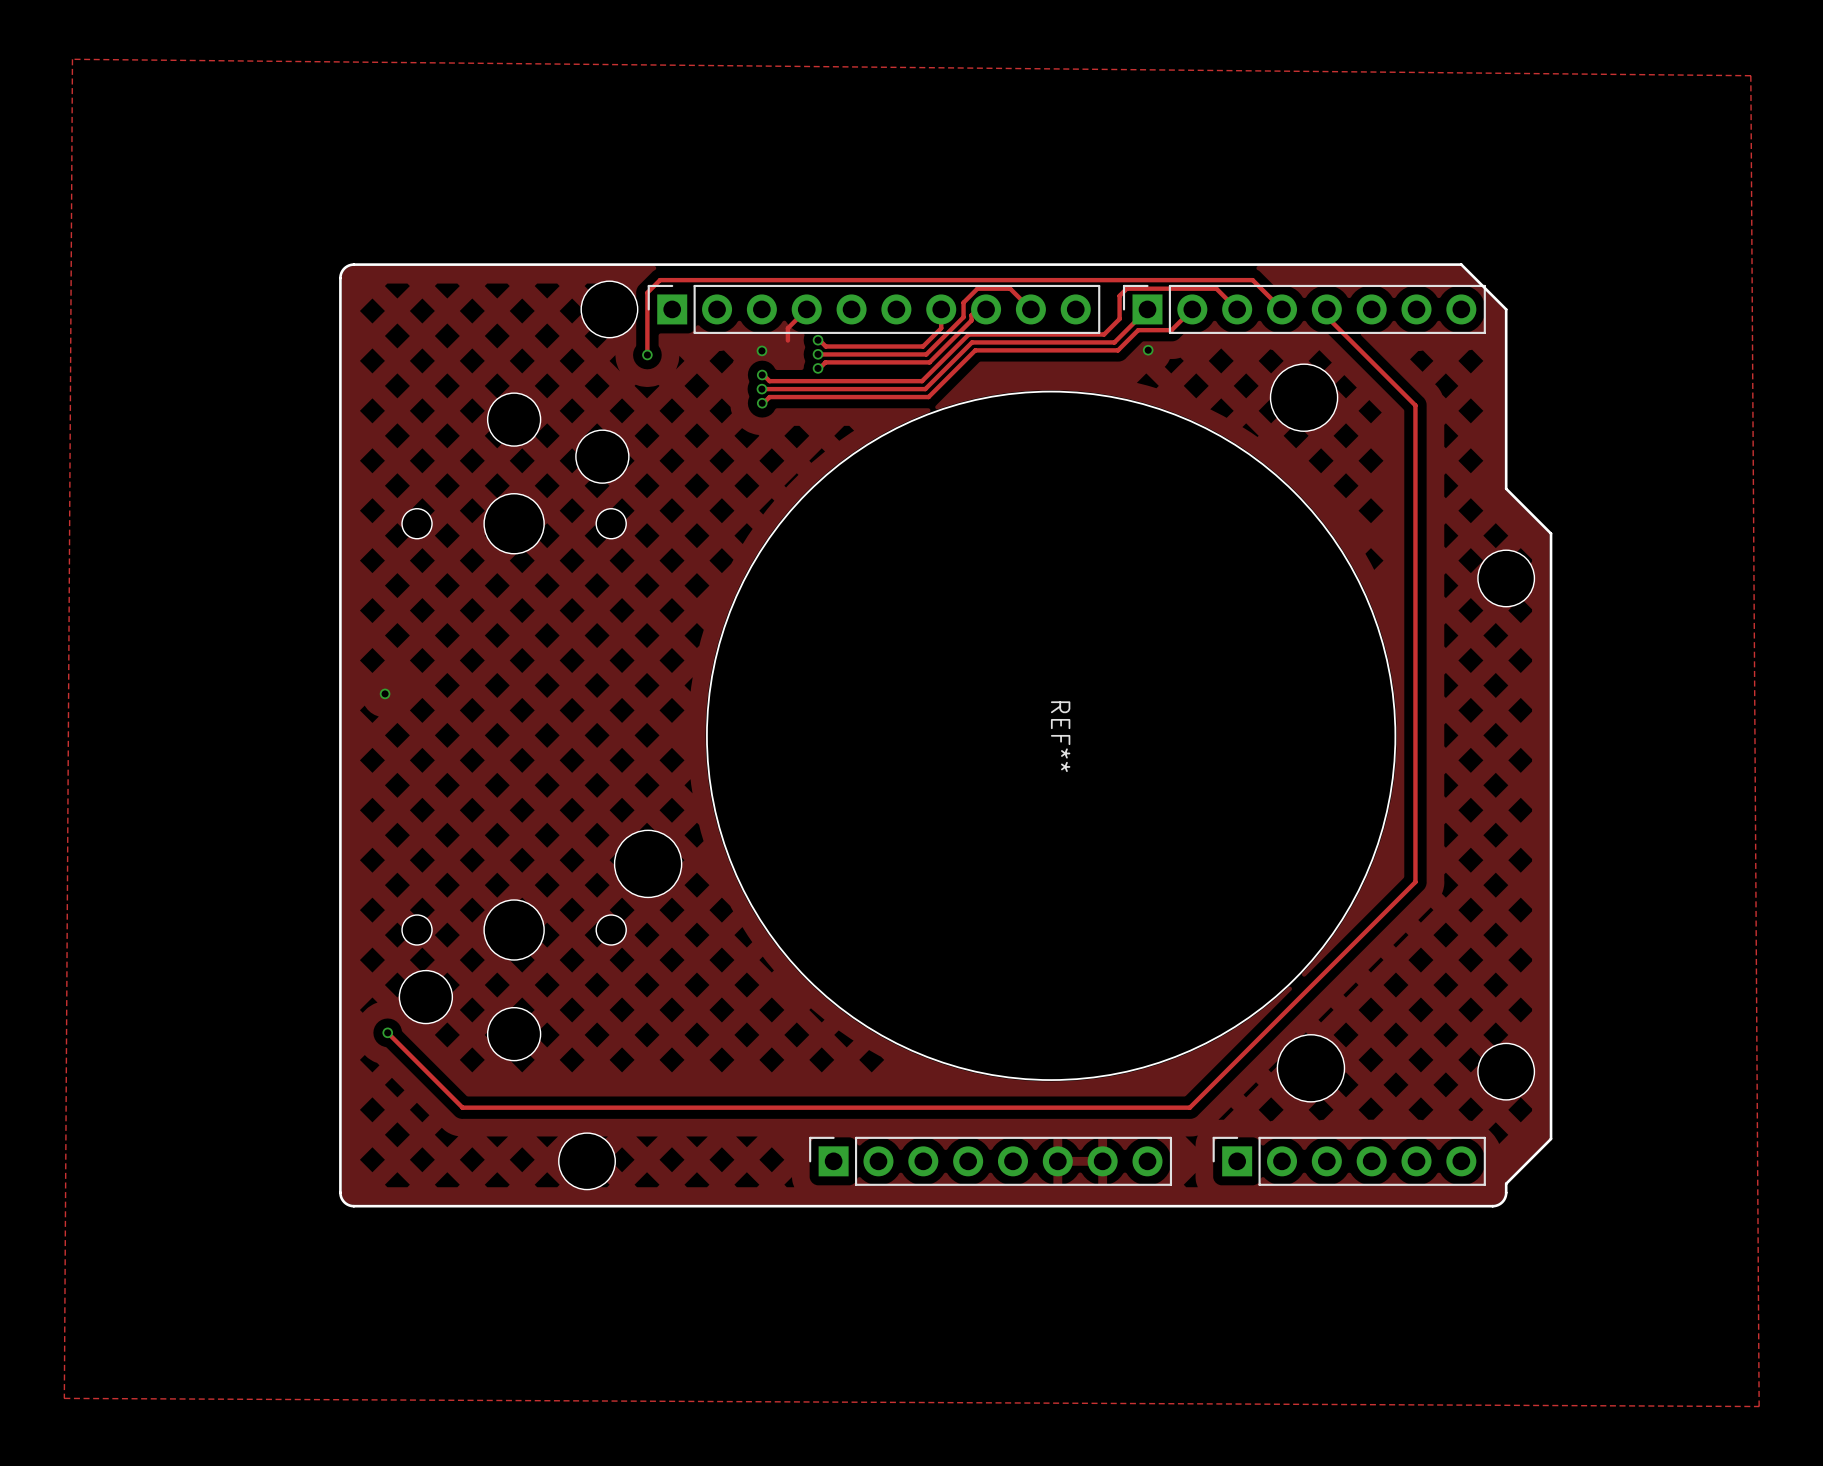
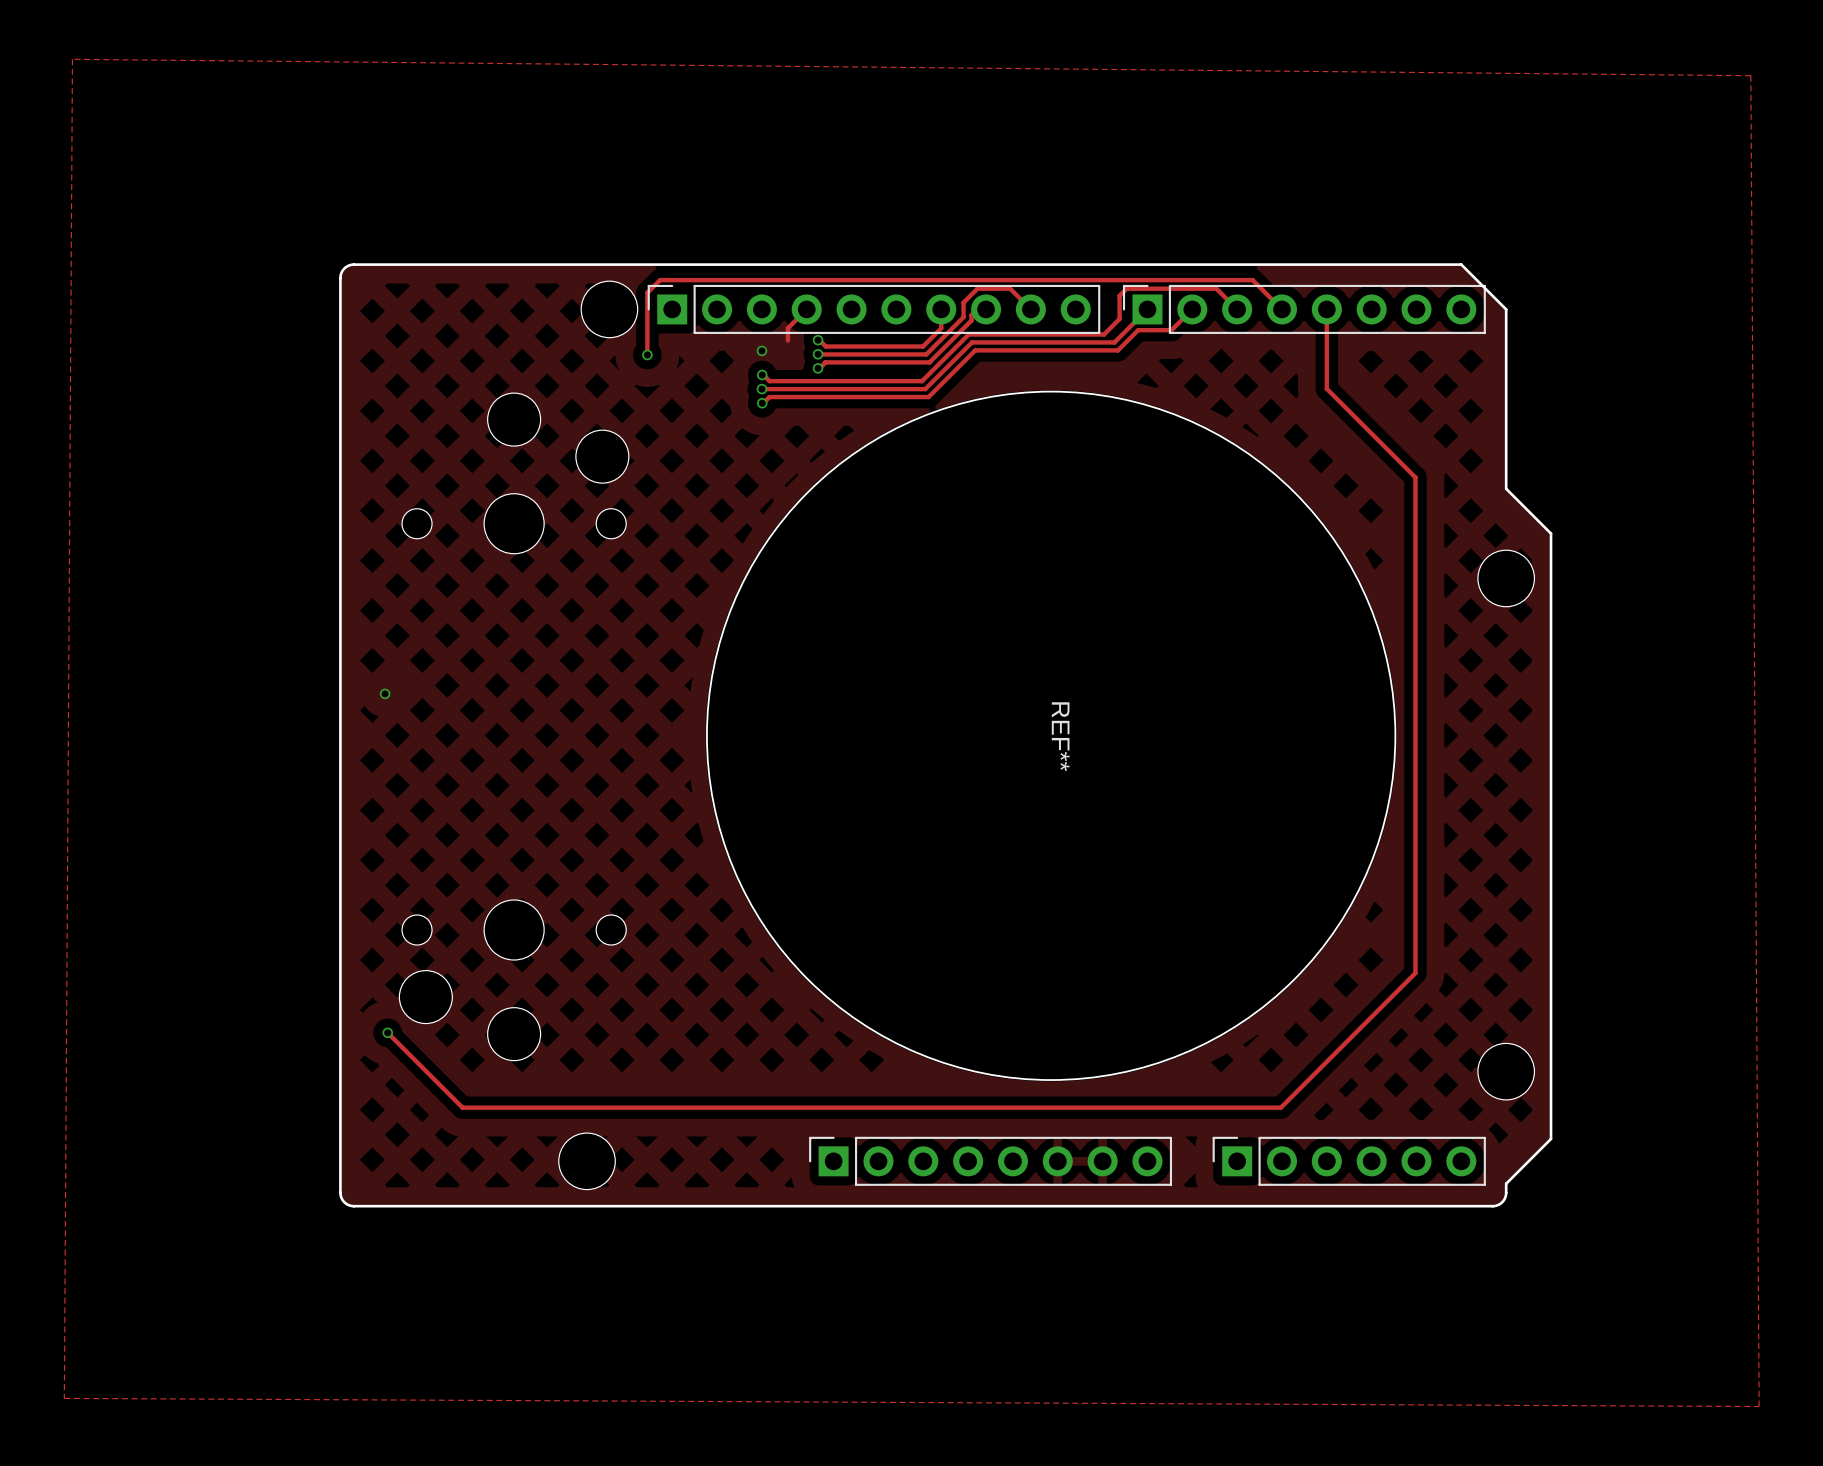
track: (1326, 316) (1415, 405) (1415, 477) -> (1326, 316) (1326, 388) (1415, 477)
via: (1148, 350) -> none
part: (1304, 397) -> none
part: (648, 863) -> none
track: (1415, 882) (1189, 1107) -> (1415, 882) (1415, 973) (1280, 1107) (1189, 1107)
part: (1310, 1068) -> none

